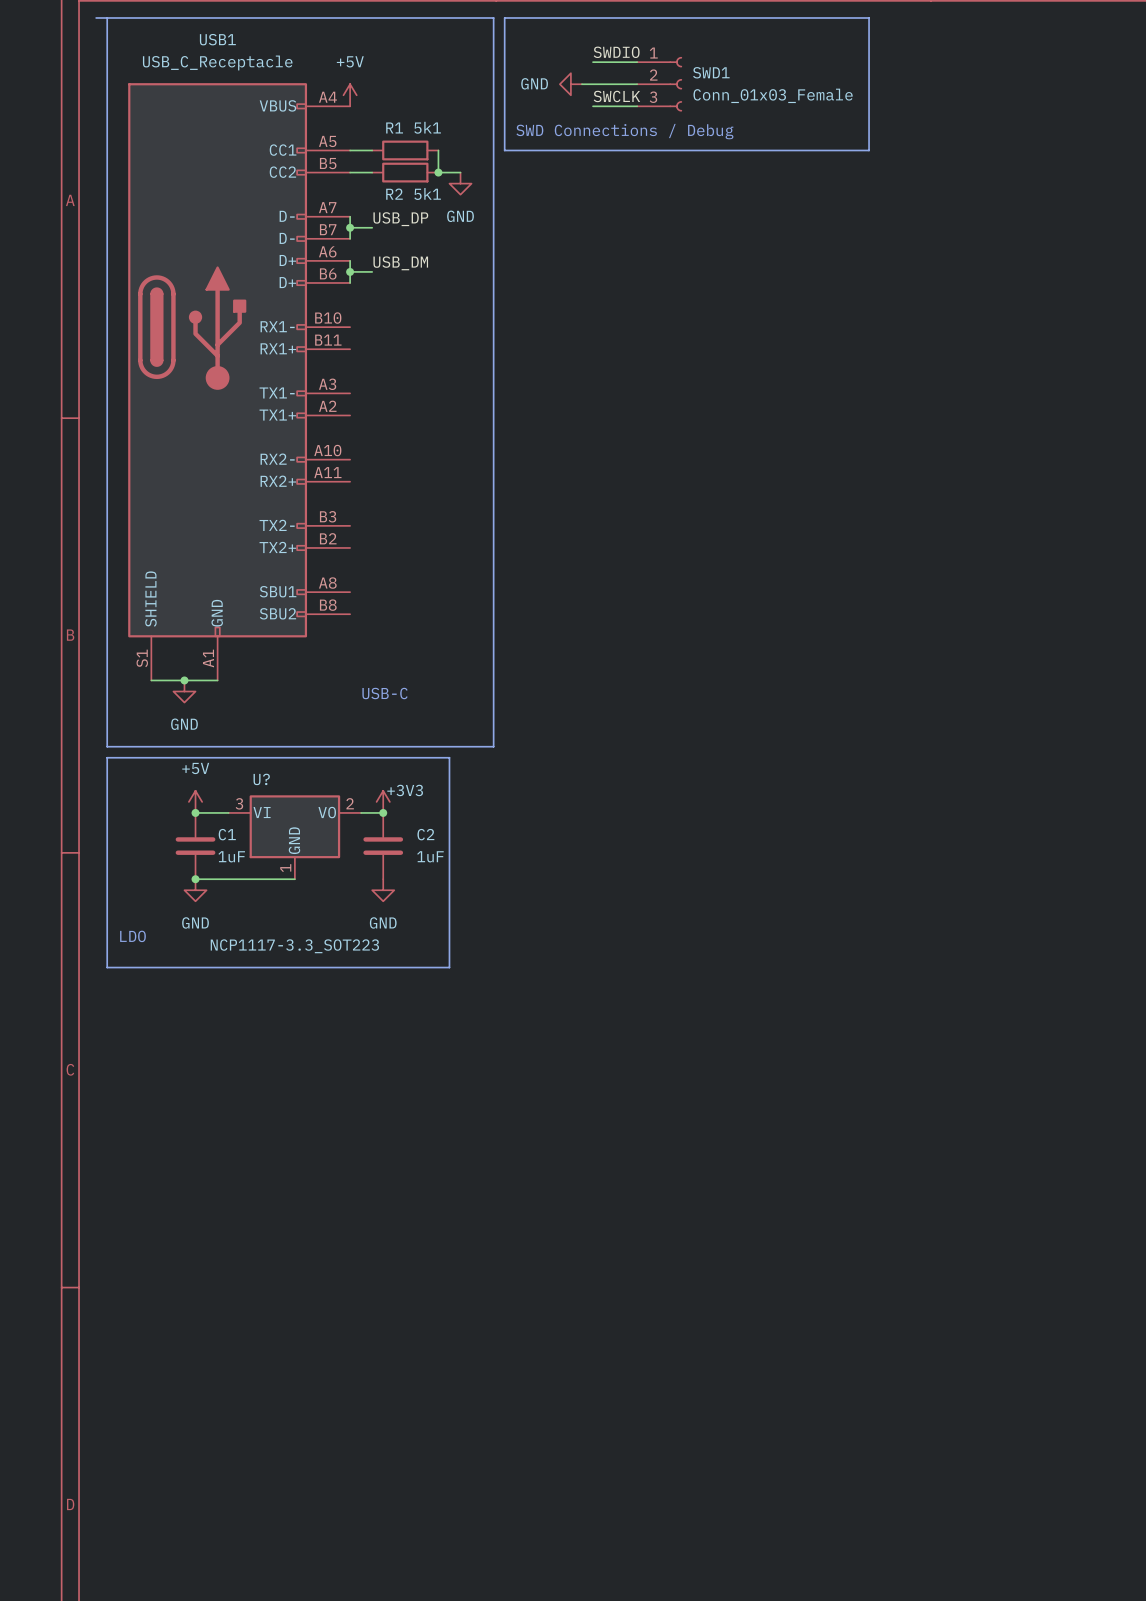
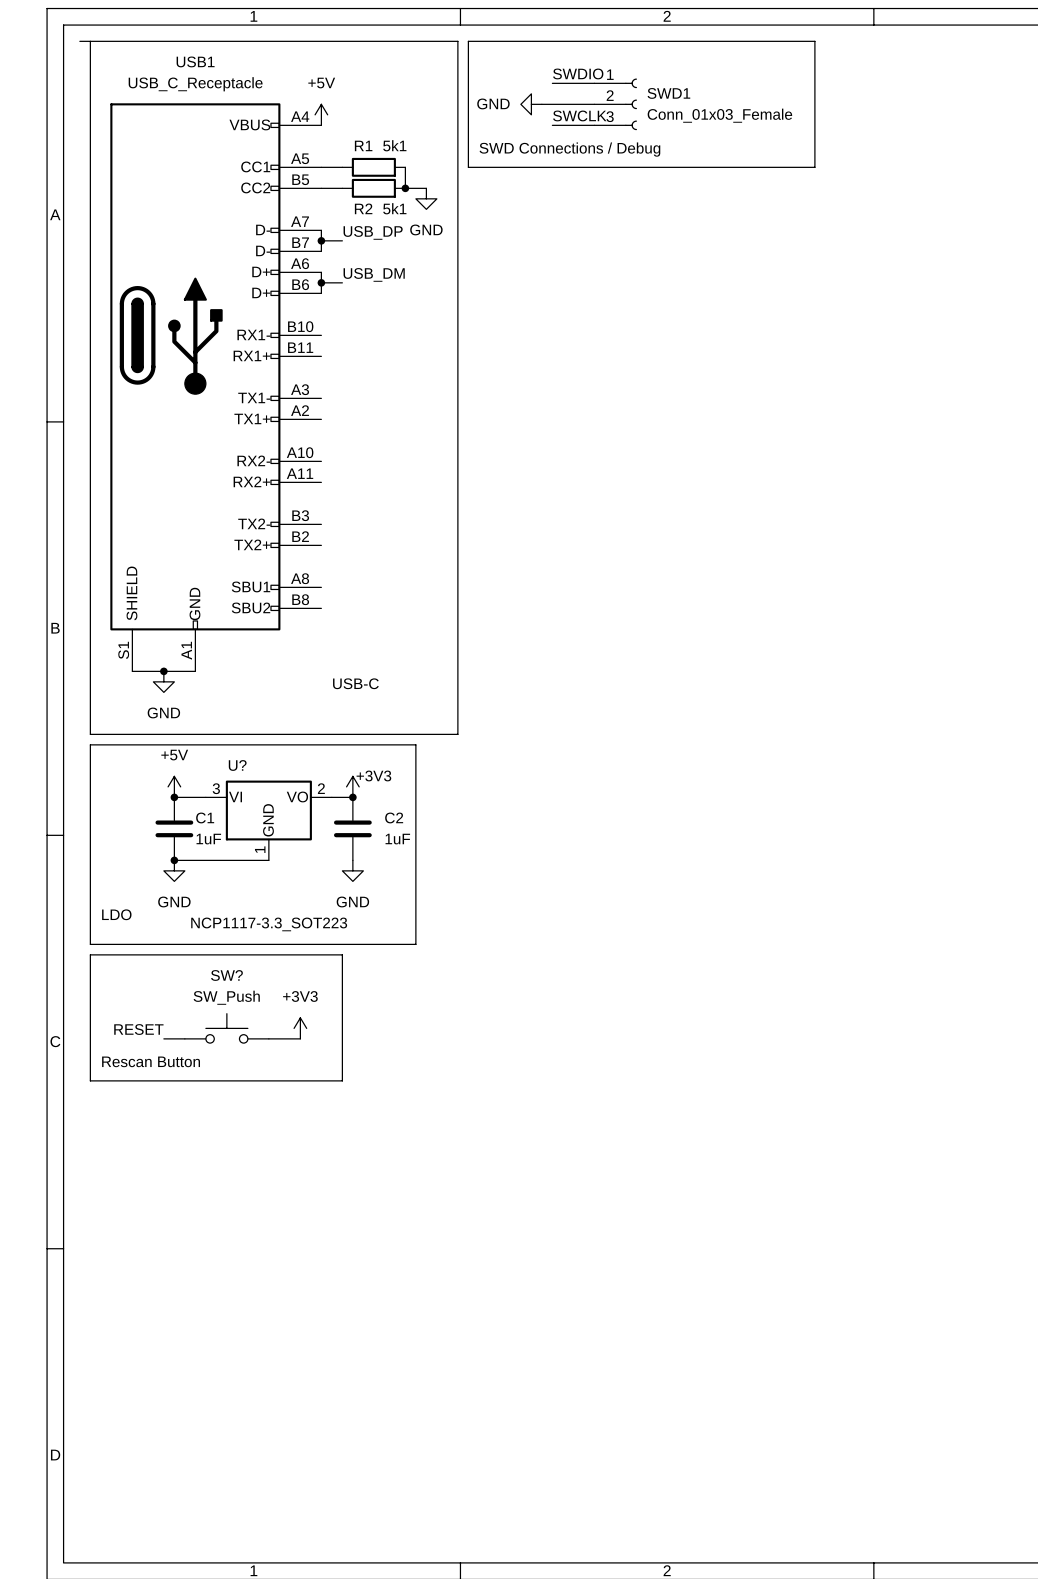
line: none -> (90, 954) (342, 954) (342, 1080) (90, 1080) (90, 954)
SW?: none -> SW_Push (226, 1028)
power symbol: none -> +3V3 (300, 1028)
label: none -> RESET (138, 1029)
wire: none -> (163, 1038) (184, 1038)
wire: none -> (268, 1038) (300, 1038)
text: none -> Rescan Button (151, 1061)

